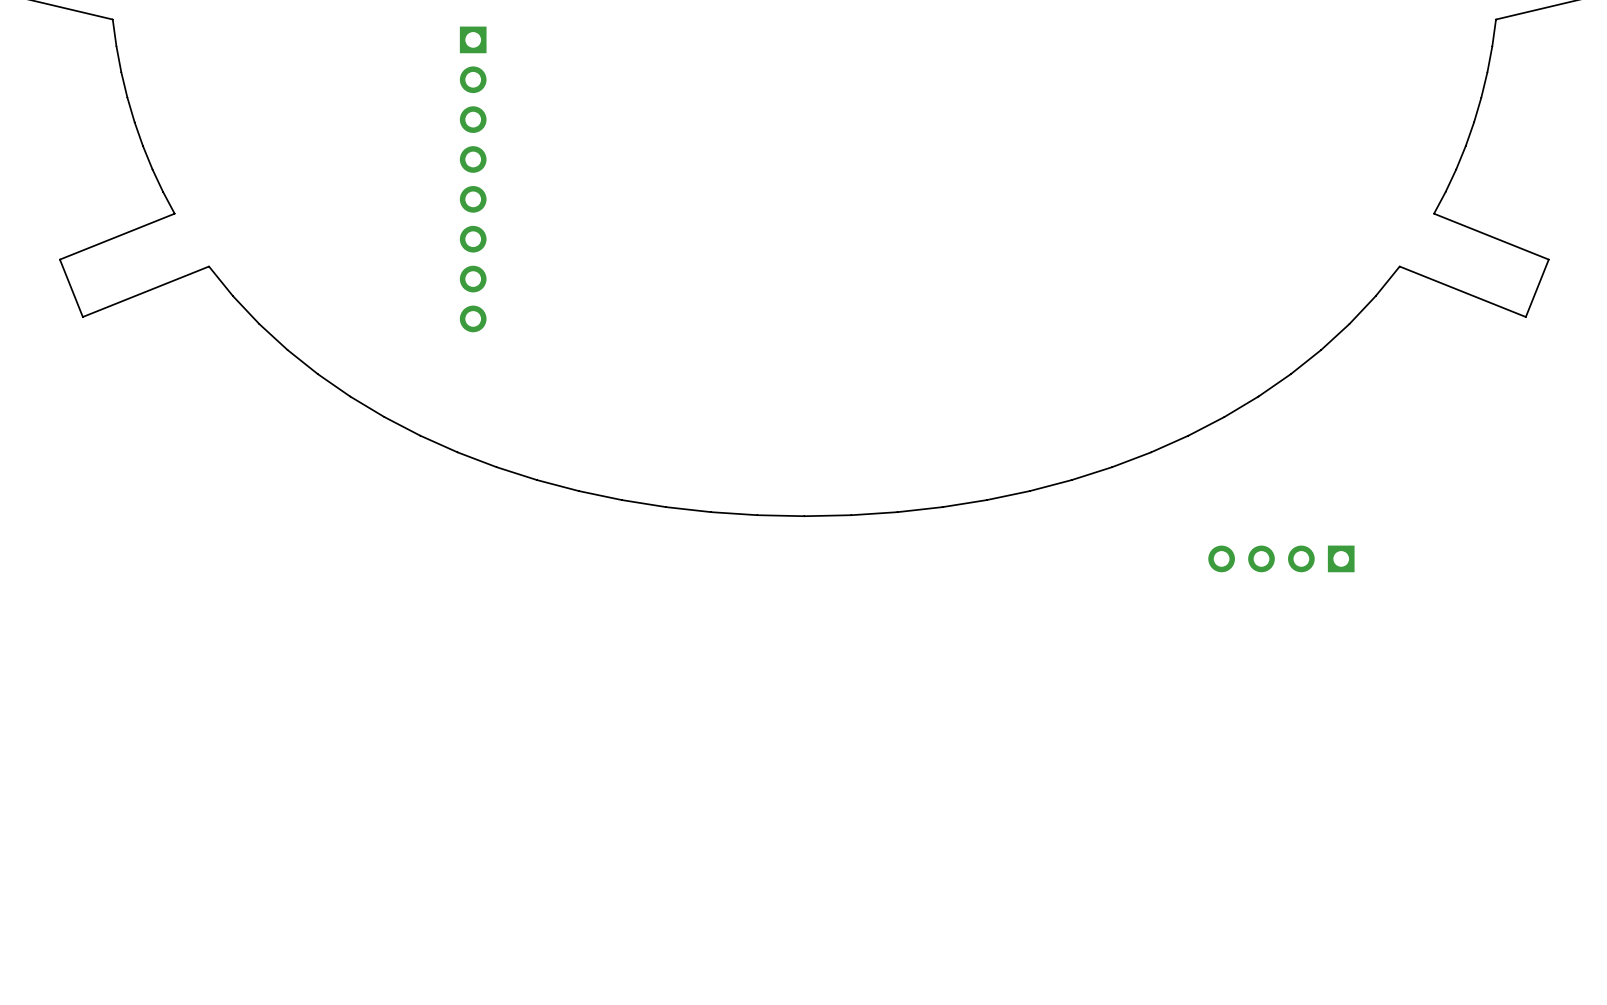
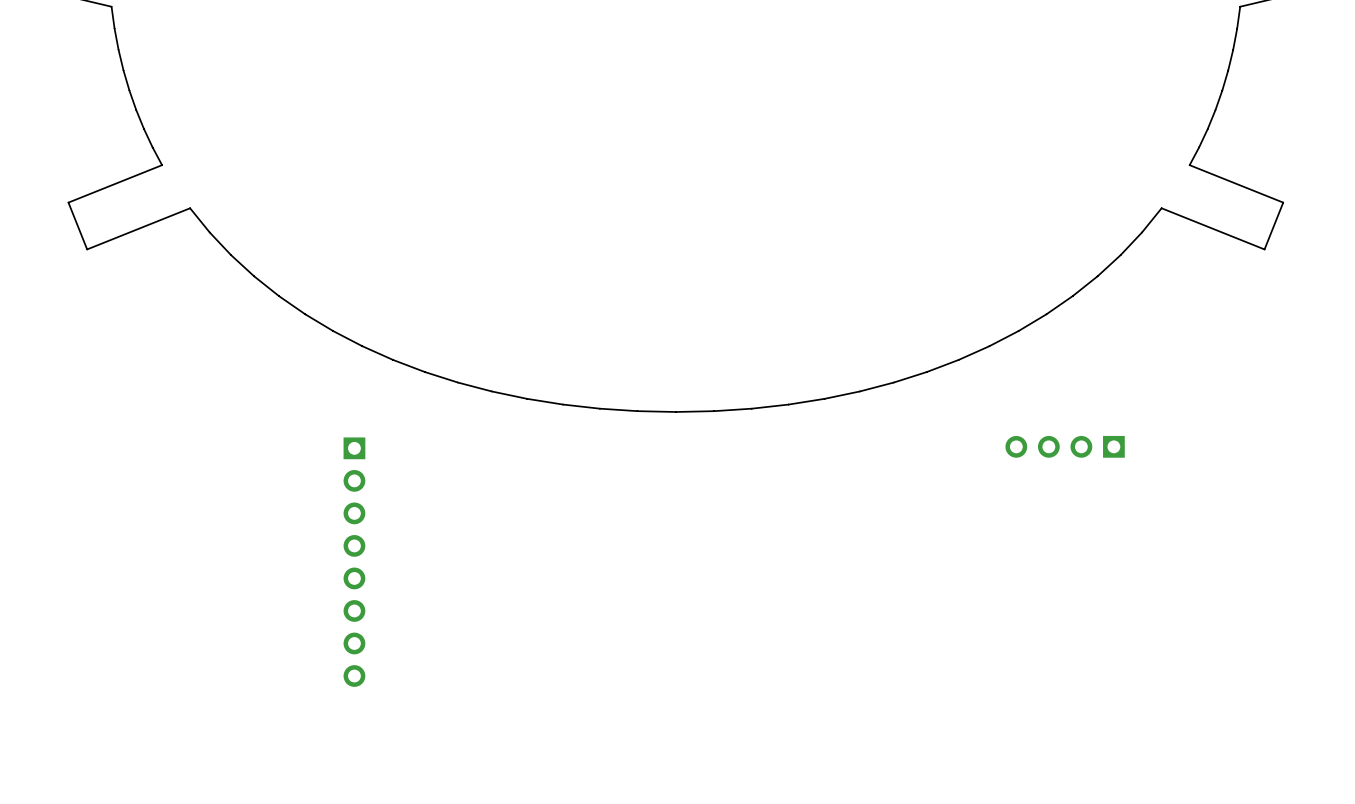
part: (473, 179) -> none
part: none -> (354, 562)

